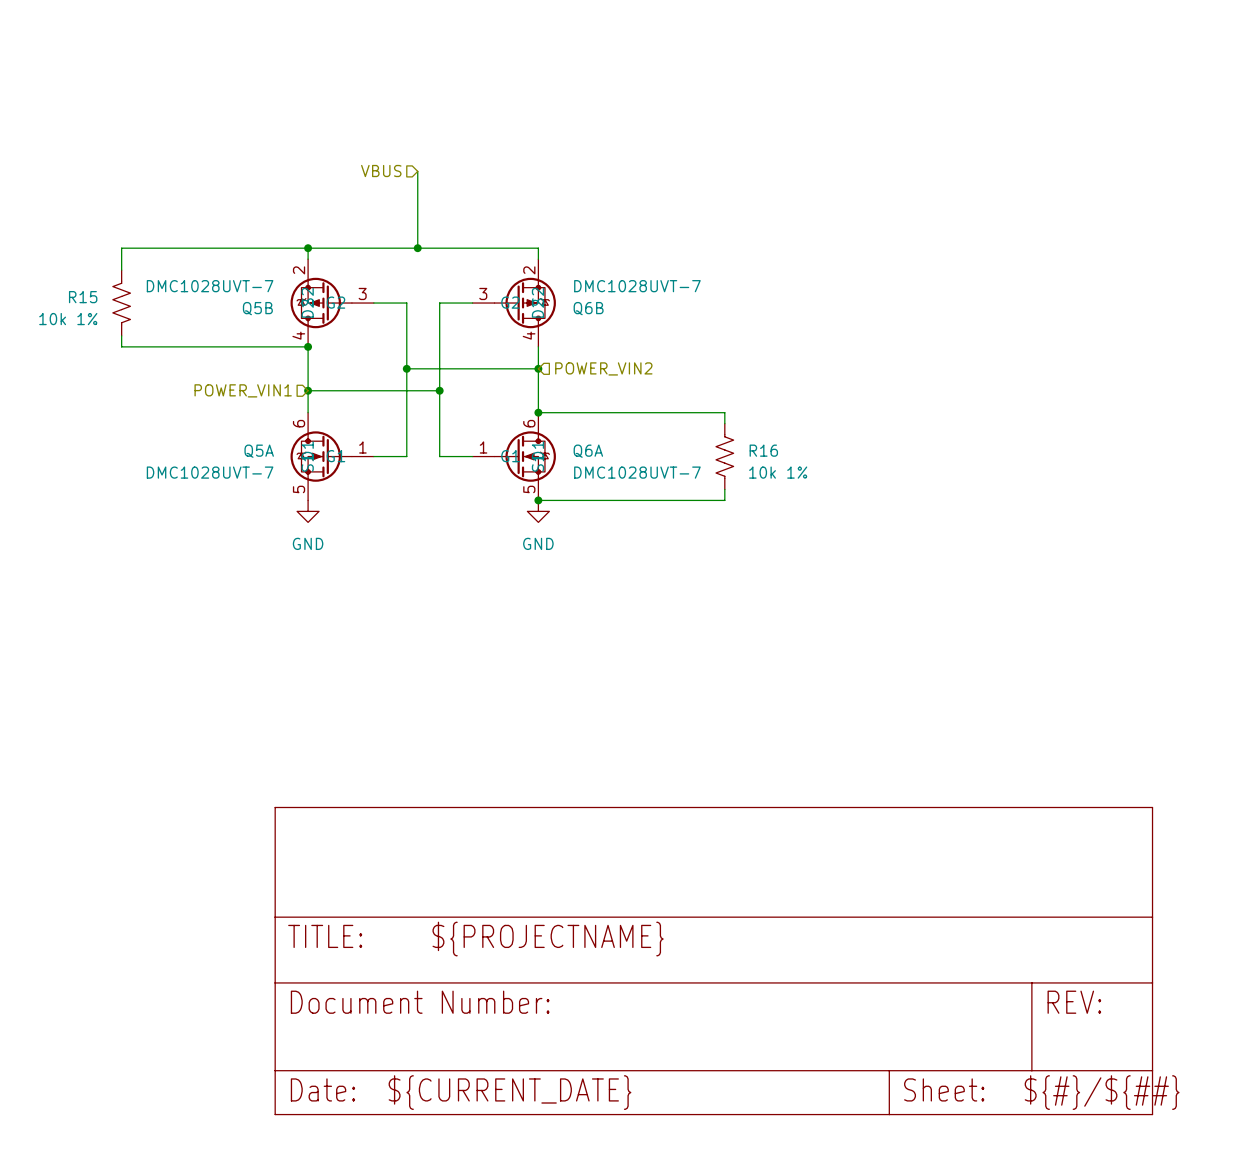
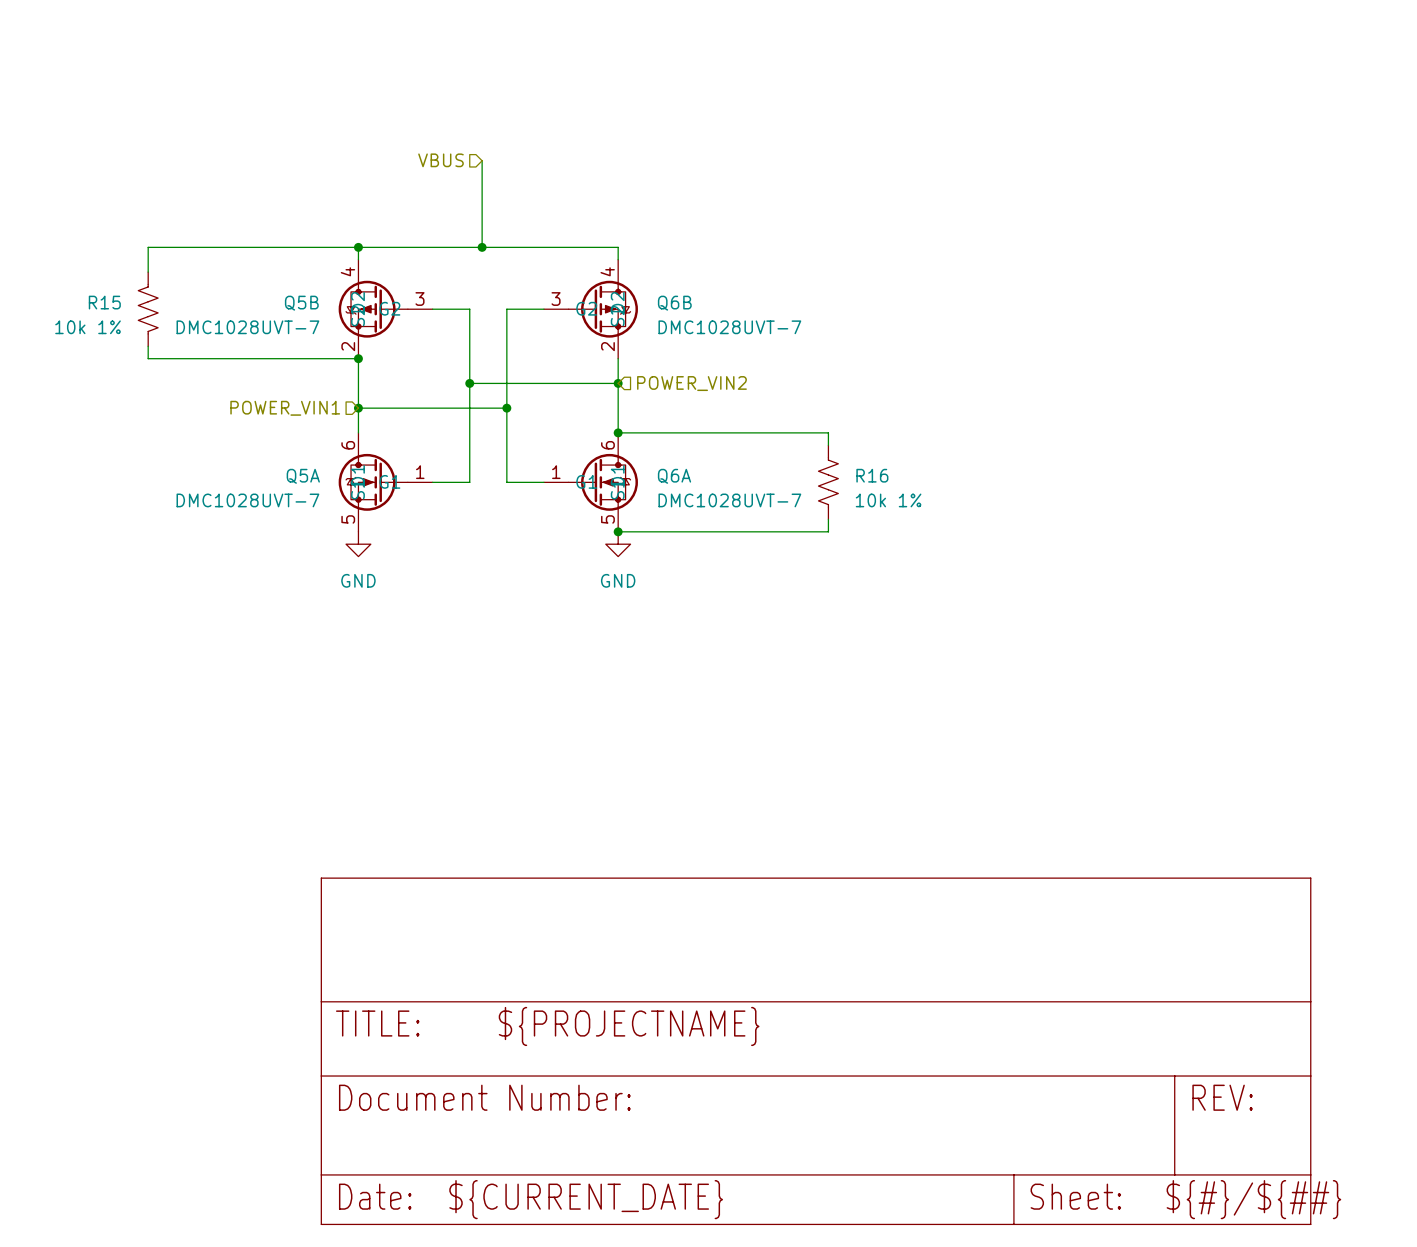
Q5B flip: as is (321, 303) -> up-down (373, 309)
Q6B flip: as is (525, 303) -> up-down (603, 309)

